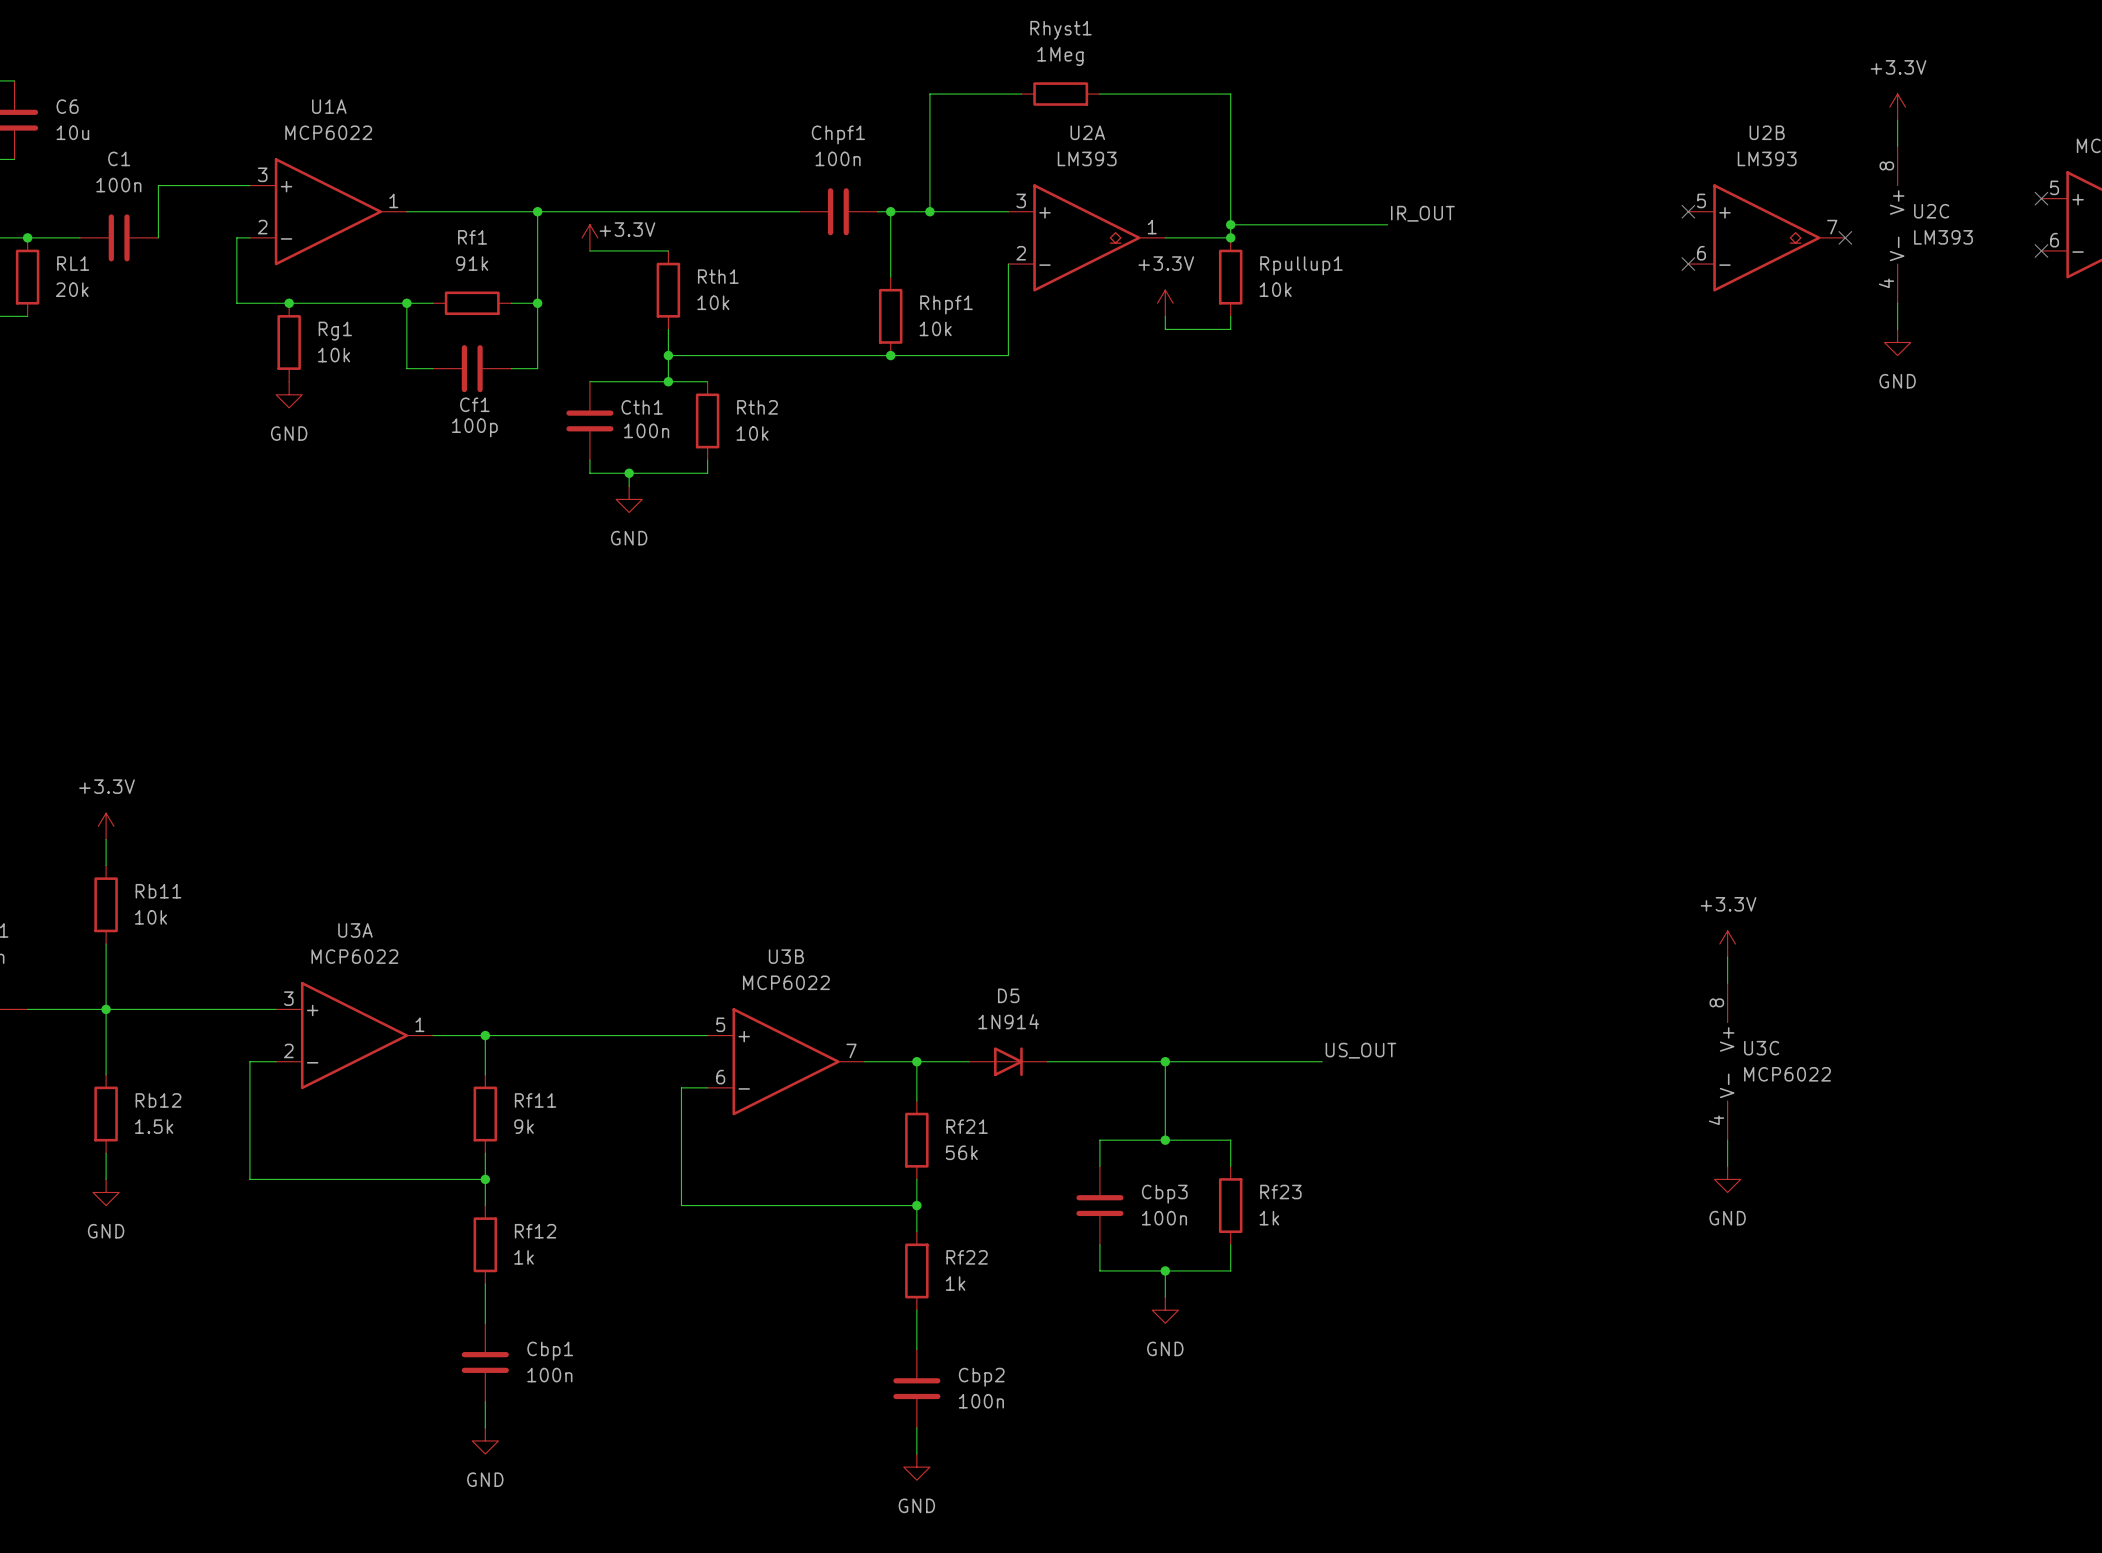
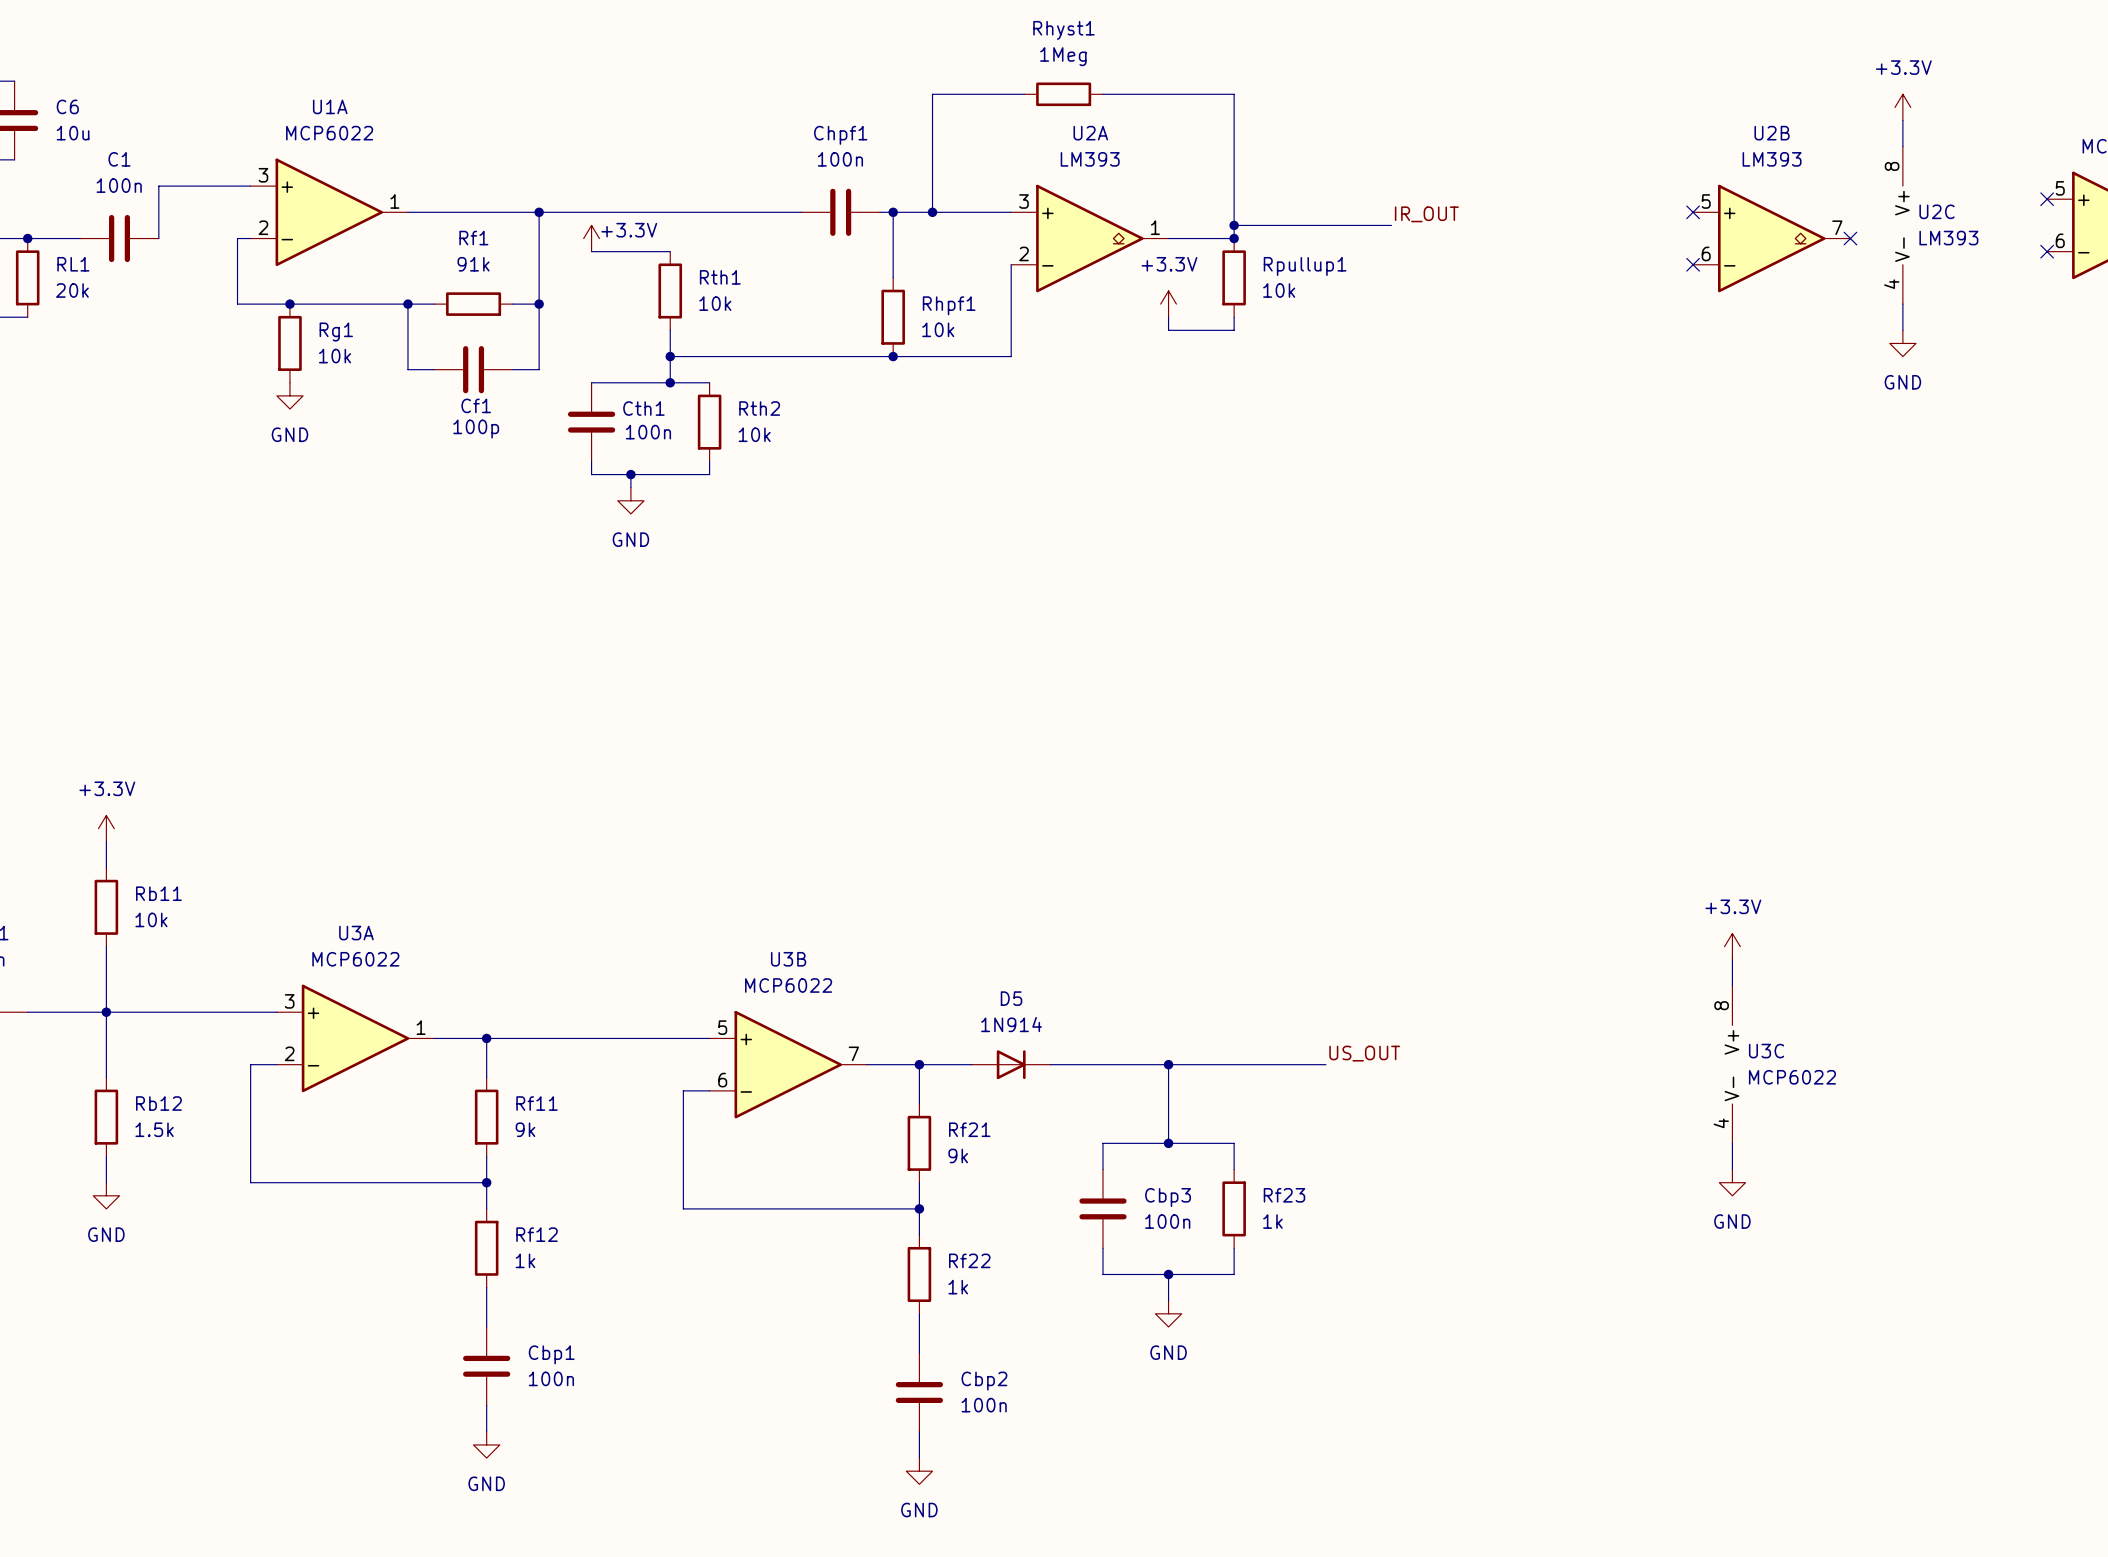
Rf21 value: 56k (961, 1152) -> 9k (958, 1155)

